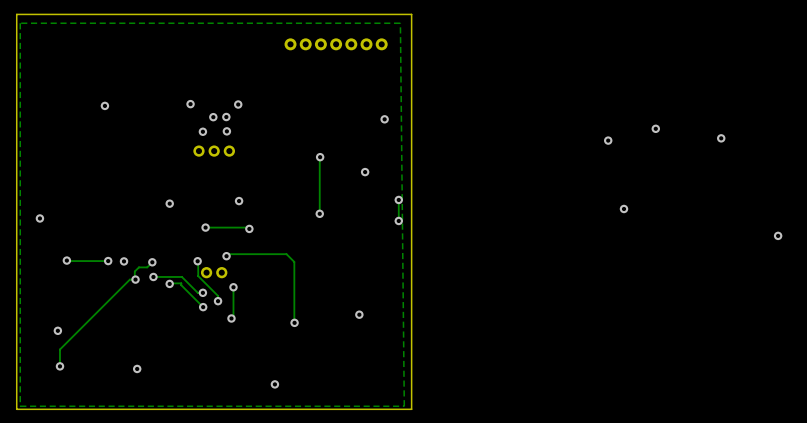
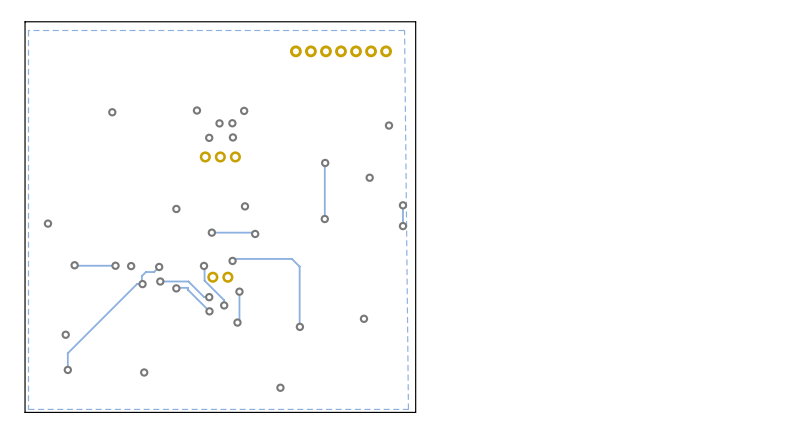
via: (655, 128) -> none
via: (721, 138) -> none
via: (608, 140) -> none
via: (623, 208) -> none
via: (778, 235) -> none

